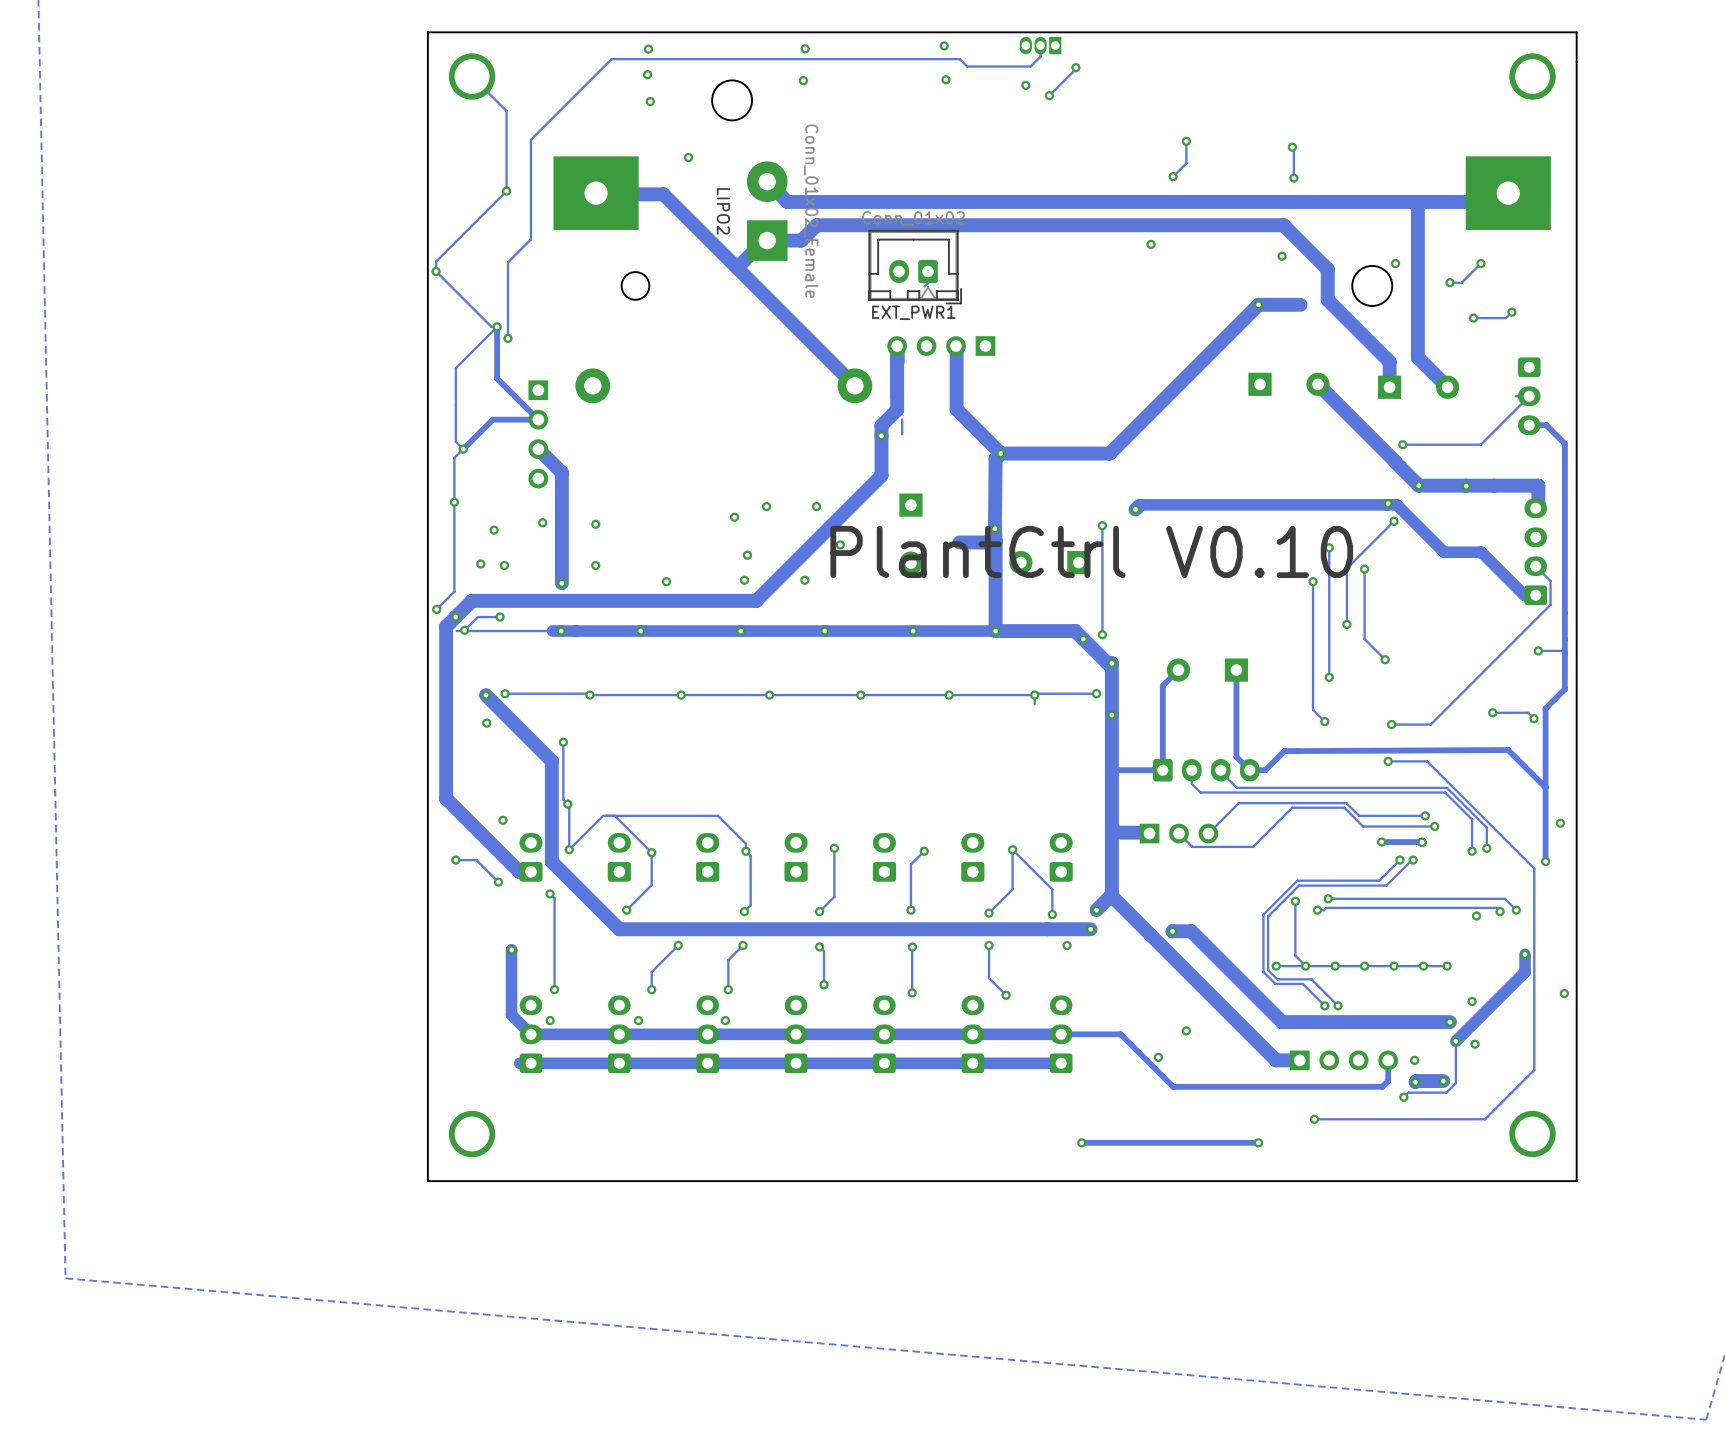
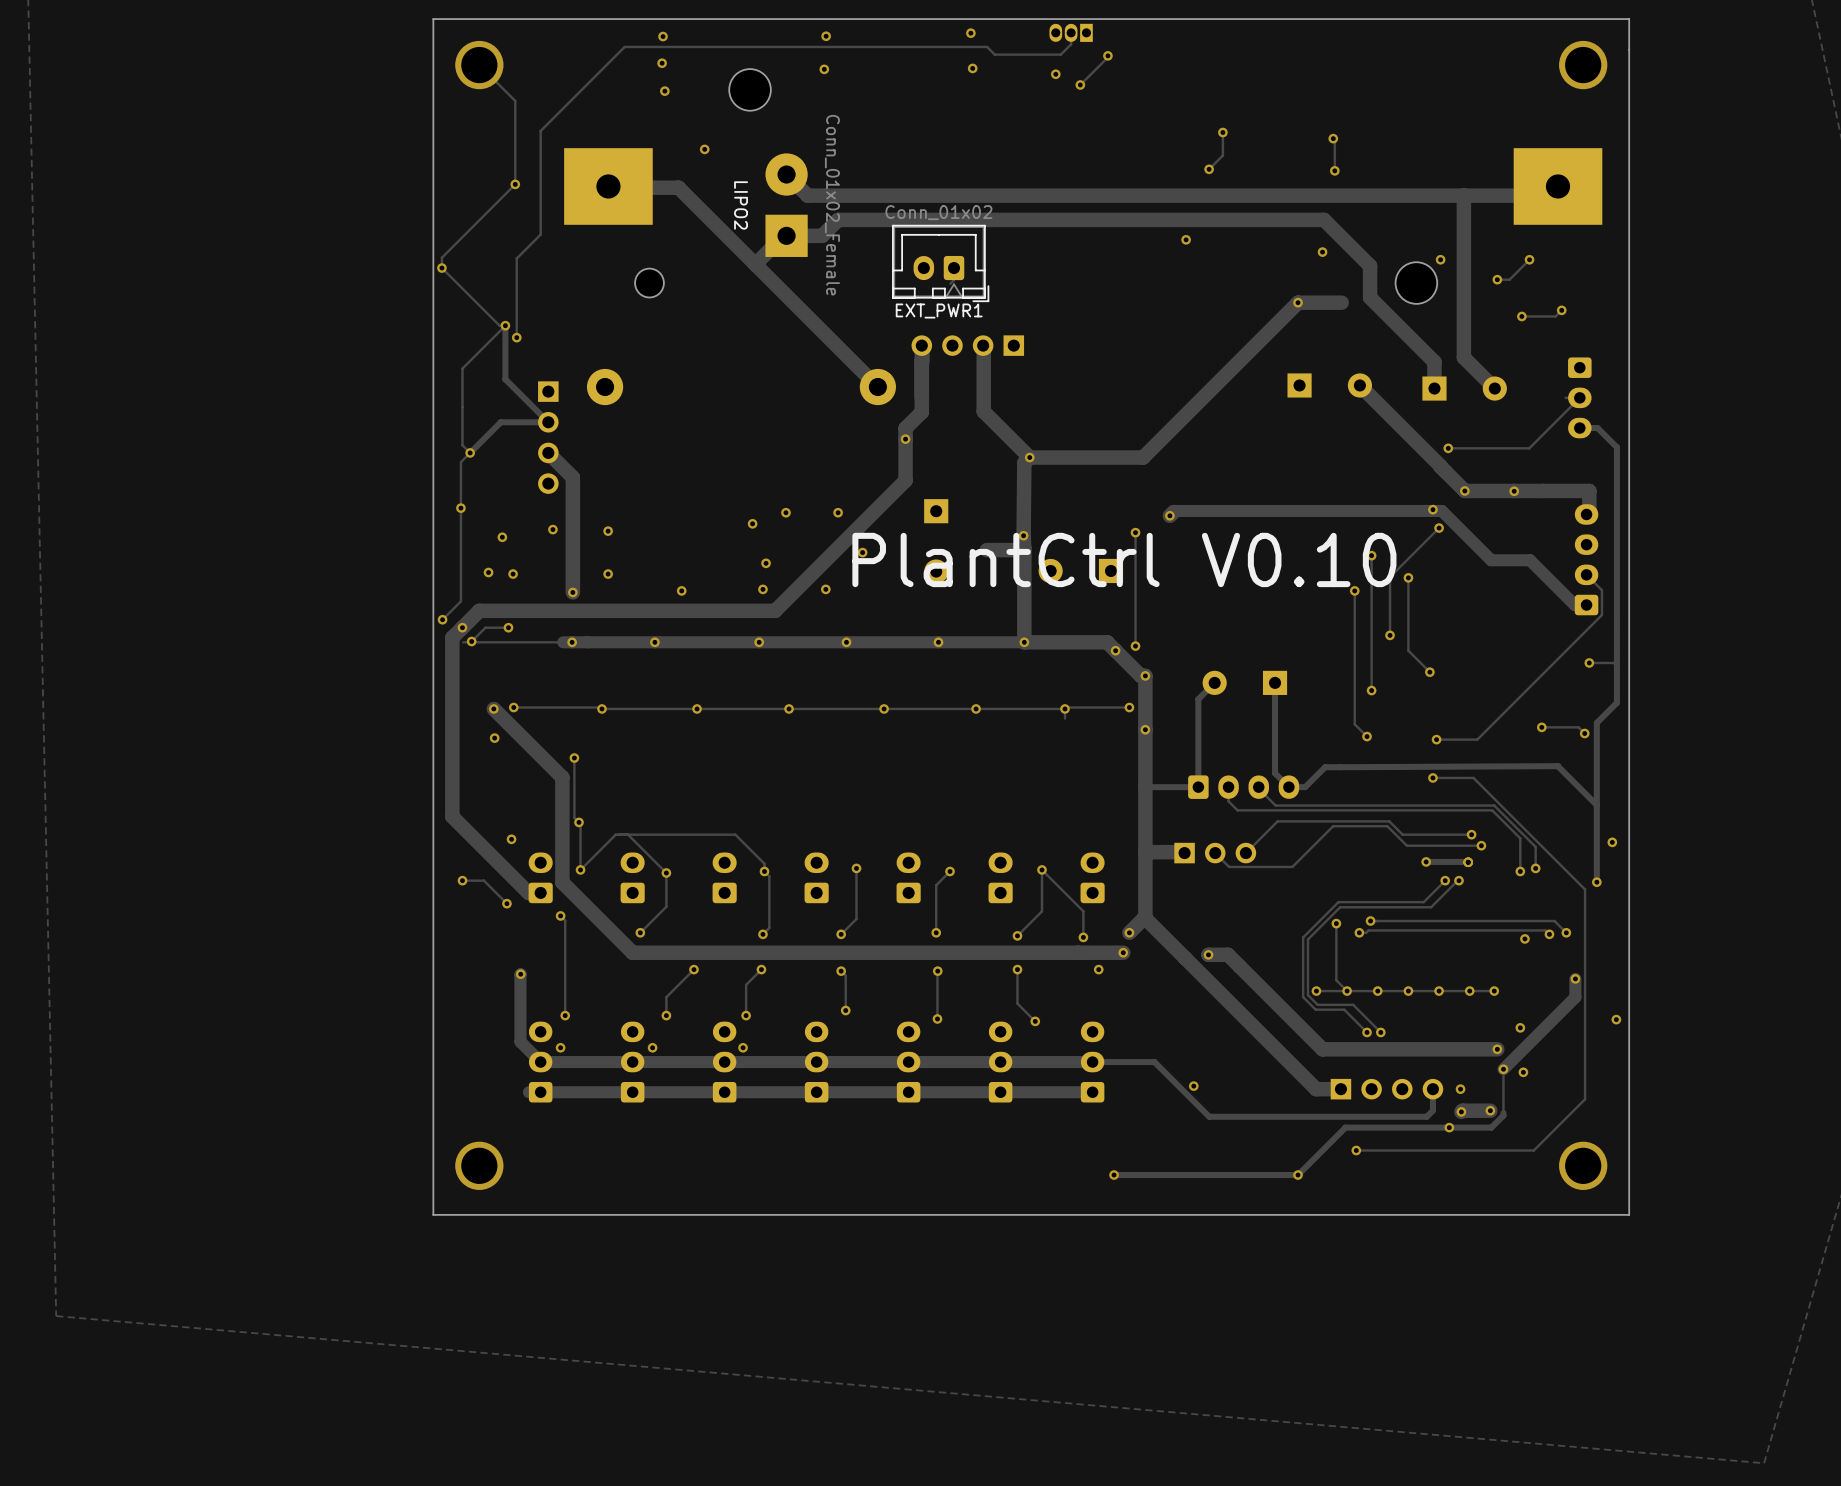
track: (902, 419) (902, 434) -> none
via: (1186, 1030) -> none
track: (1455, 1083) (1446, 1092) (1408, 1092) (1403, 1097) -> (1503, 1112) (1503, 1115) (1491, 1127) (1345, 1127) (1298, 1175)

